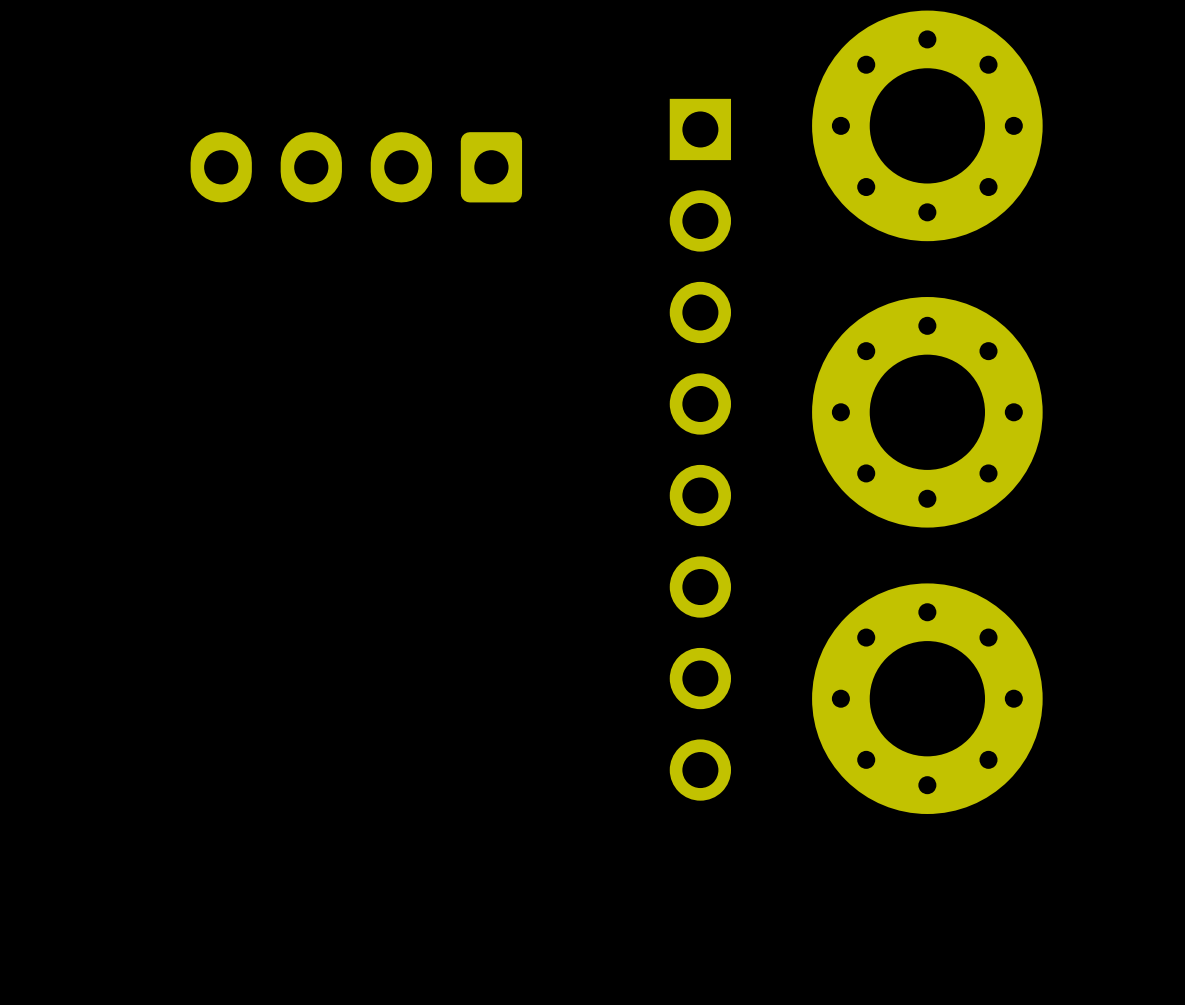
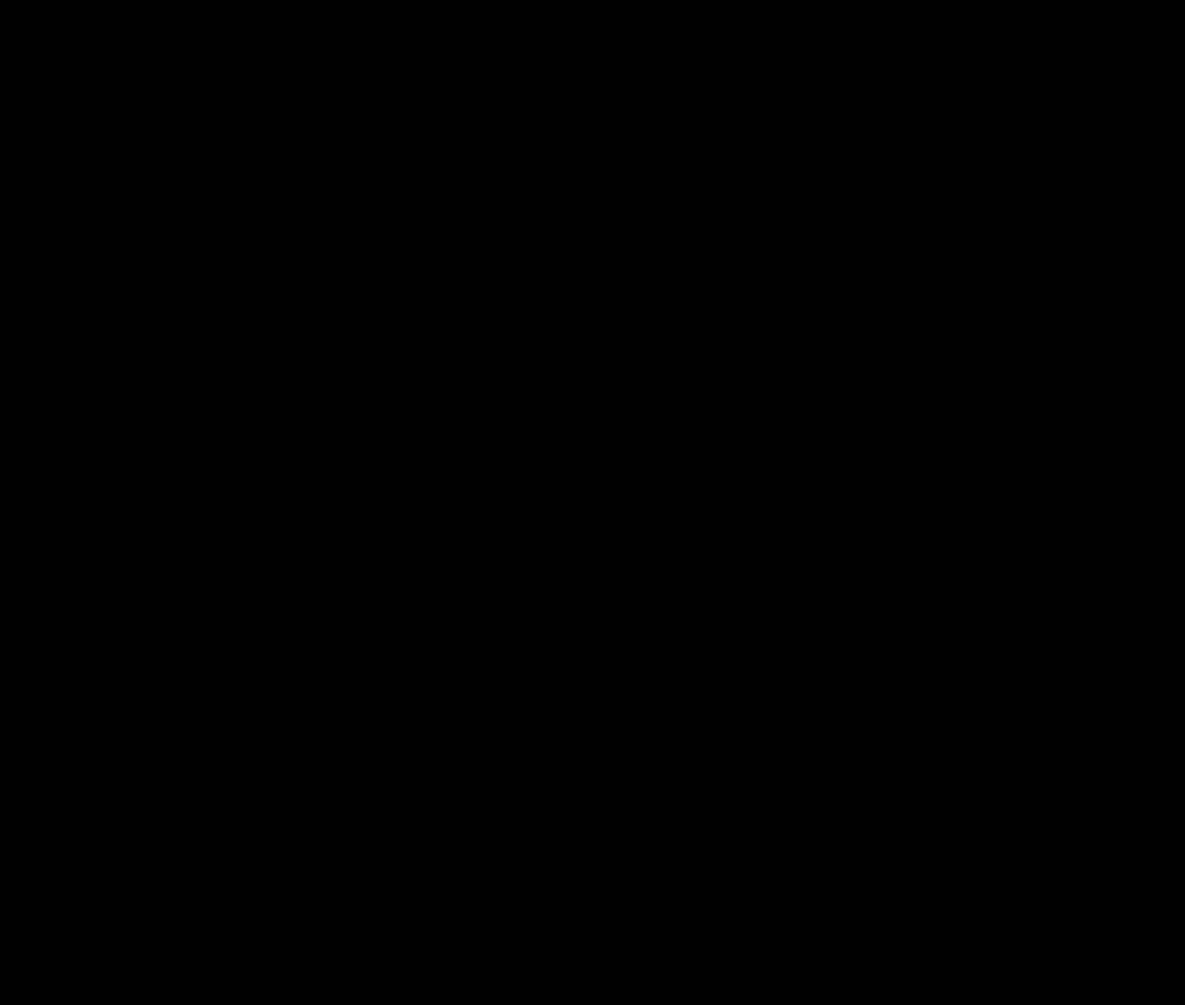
part: (927, 125) -> none
part: (356, 167) -> none
part: (927, 412) -> none
part: (700, 449) -> none
part: (927, 698) -> none

